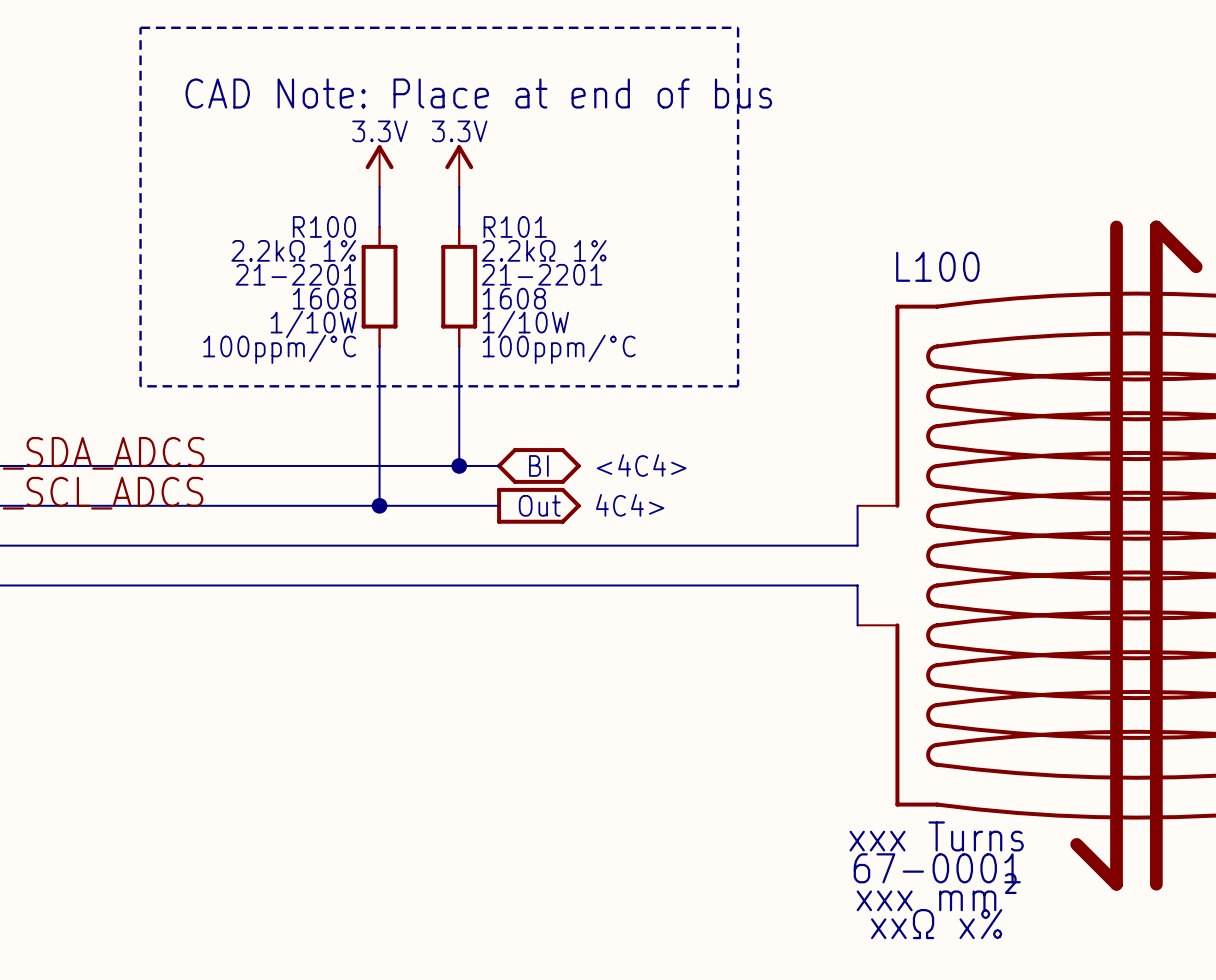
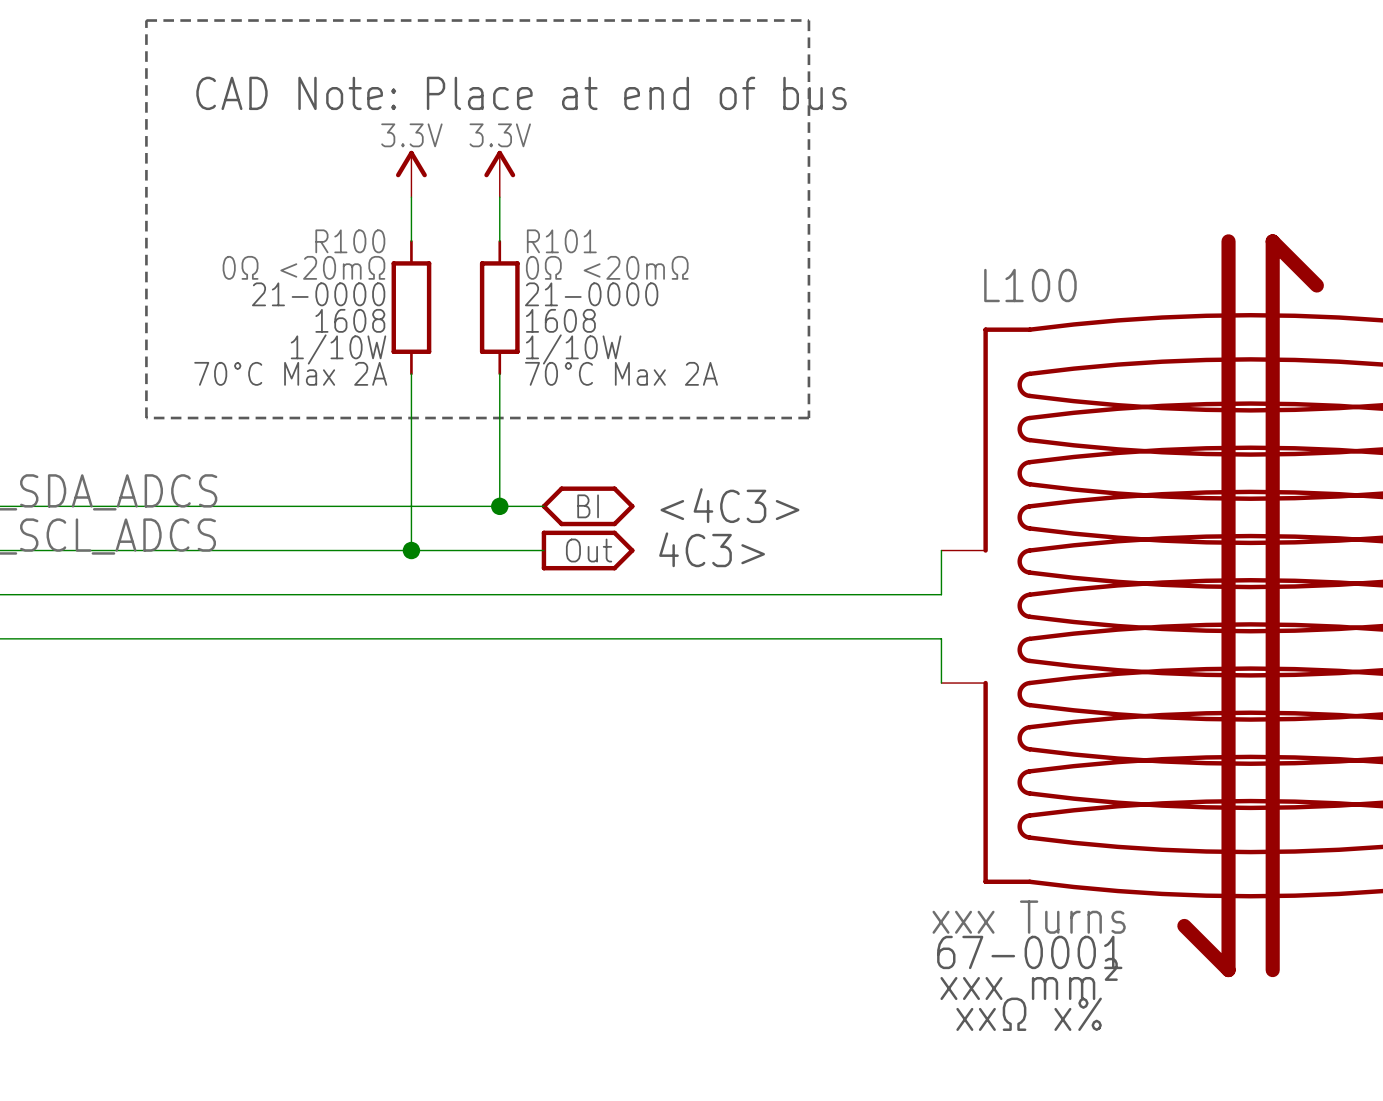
R100 value: 2.2kΩ 1% (293, 250) -> 0Ω <20mΩ (303, 267)
R101 value: 2.2kΩ 1% (544, 250) -> 0Ω <20mΩ (607, 267)
R100 text: 21-2201 (295, 274) -> 21-0000 (318, 294)
R101 text: 21-2201 (542, 274) -> 21-0000 (591, 294)
R100 text: 100ppm/°C (279, 349) -> 70°C Max 2A (290, 373)
R101 text: 100ppm/°C (559, 349) -> 70°C Max 2A (621, 373)
text: <4C4> (641, 465) -> <4C3> (729, 505)
text: 4C4> (630, 505) -> 4C3> (712, 549)

